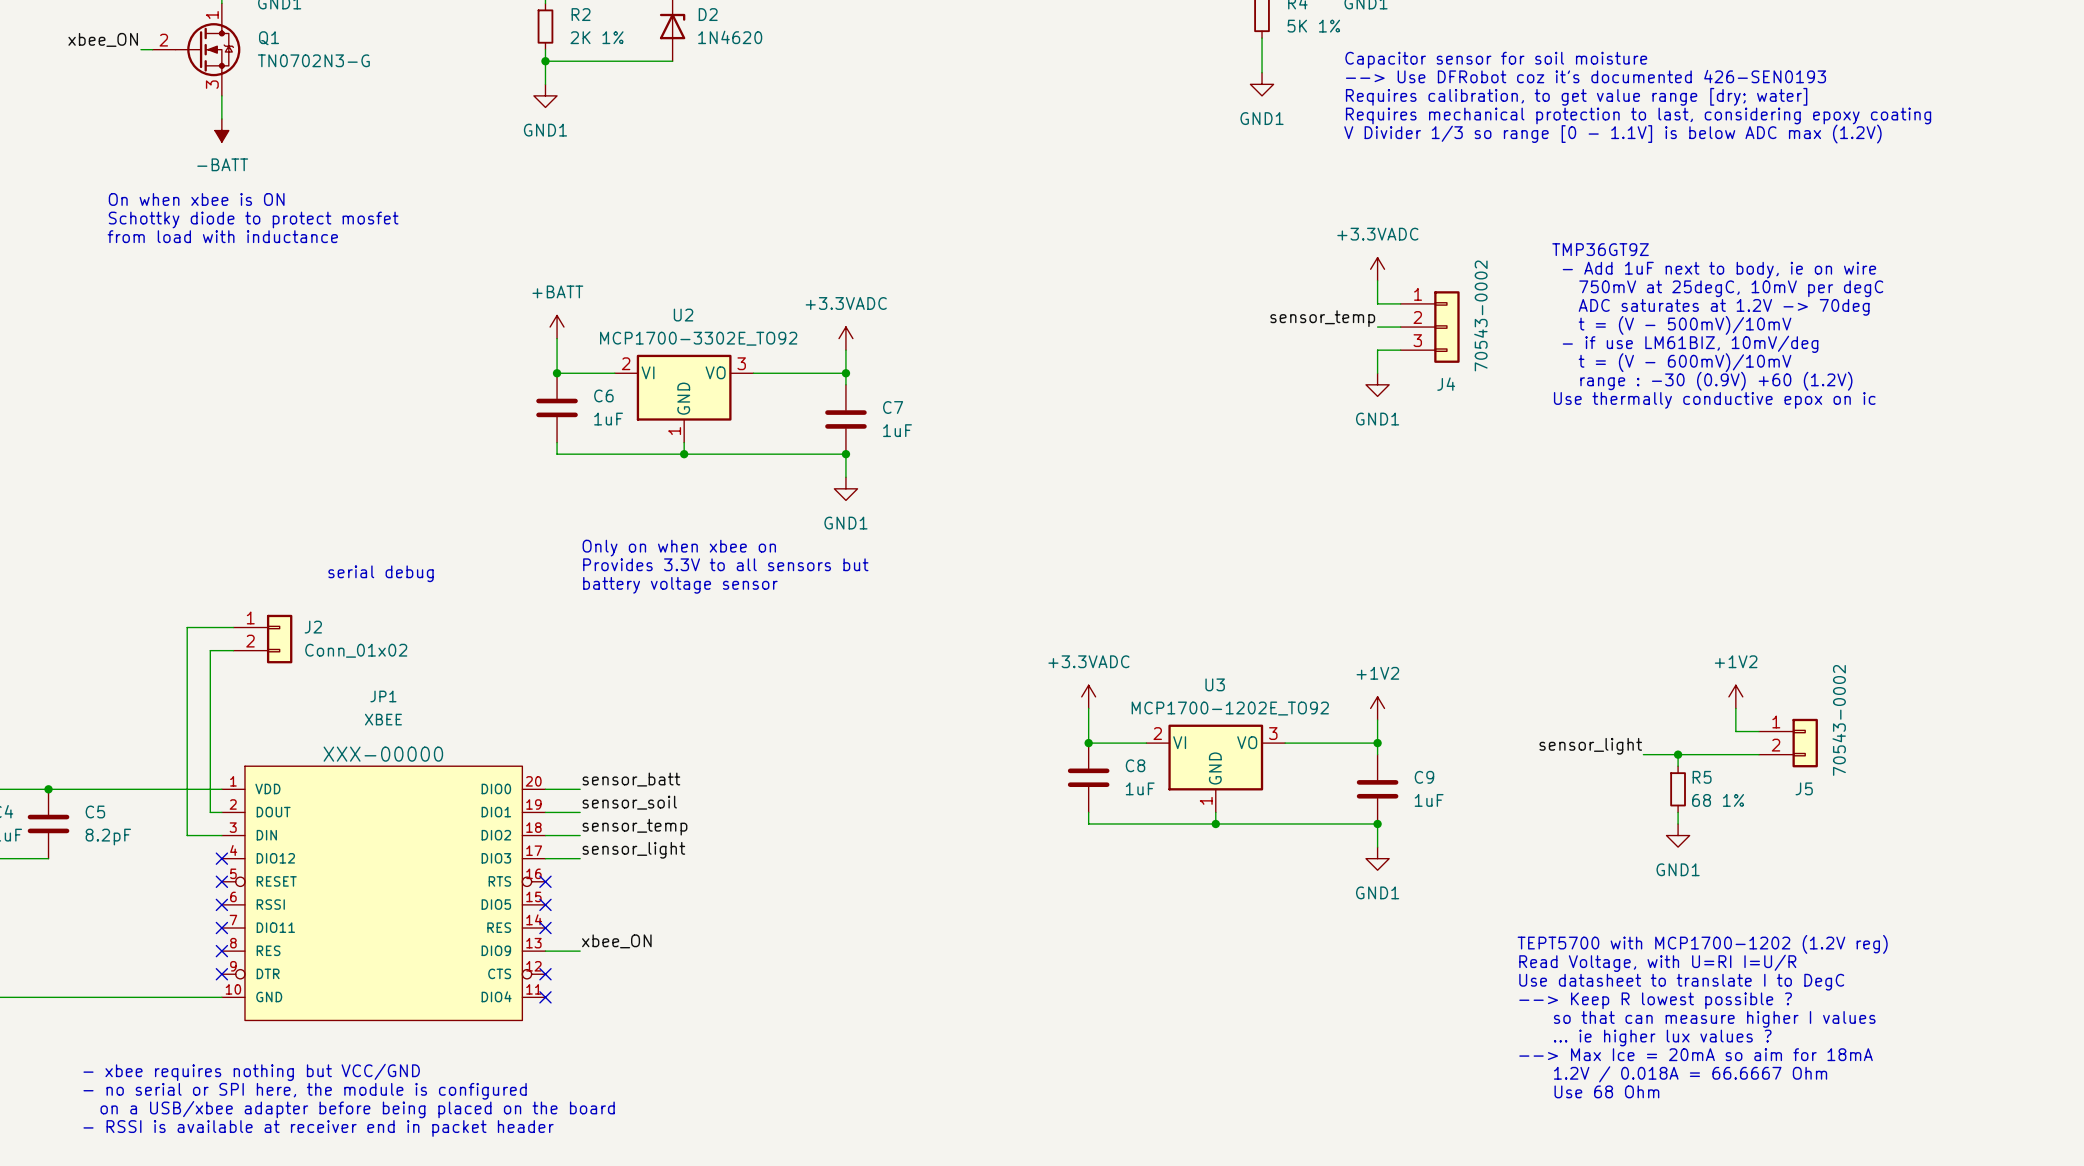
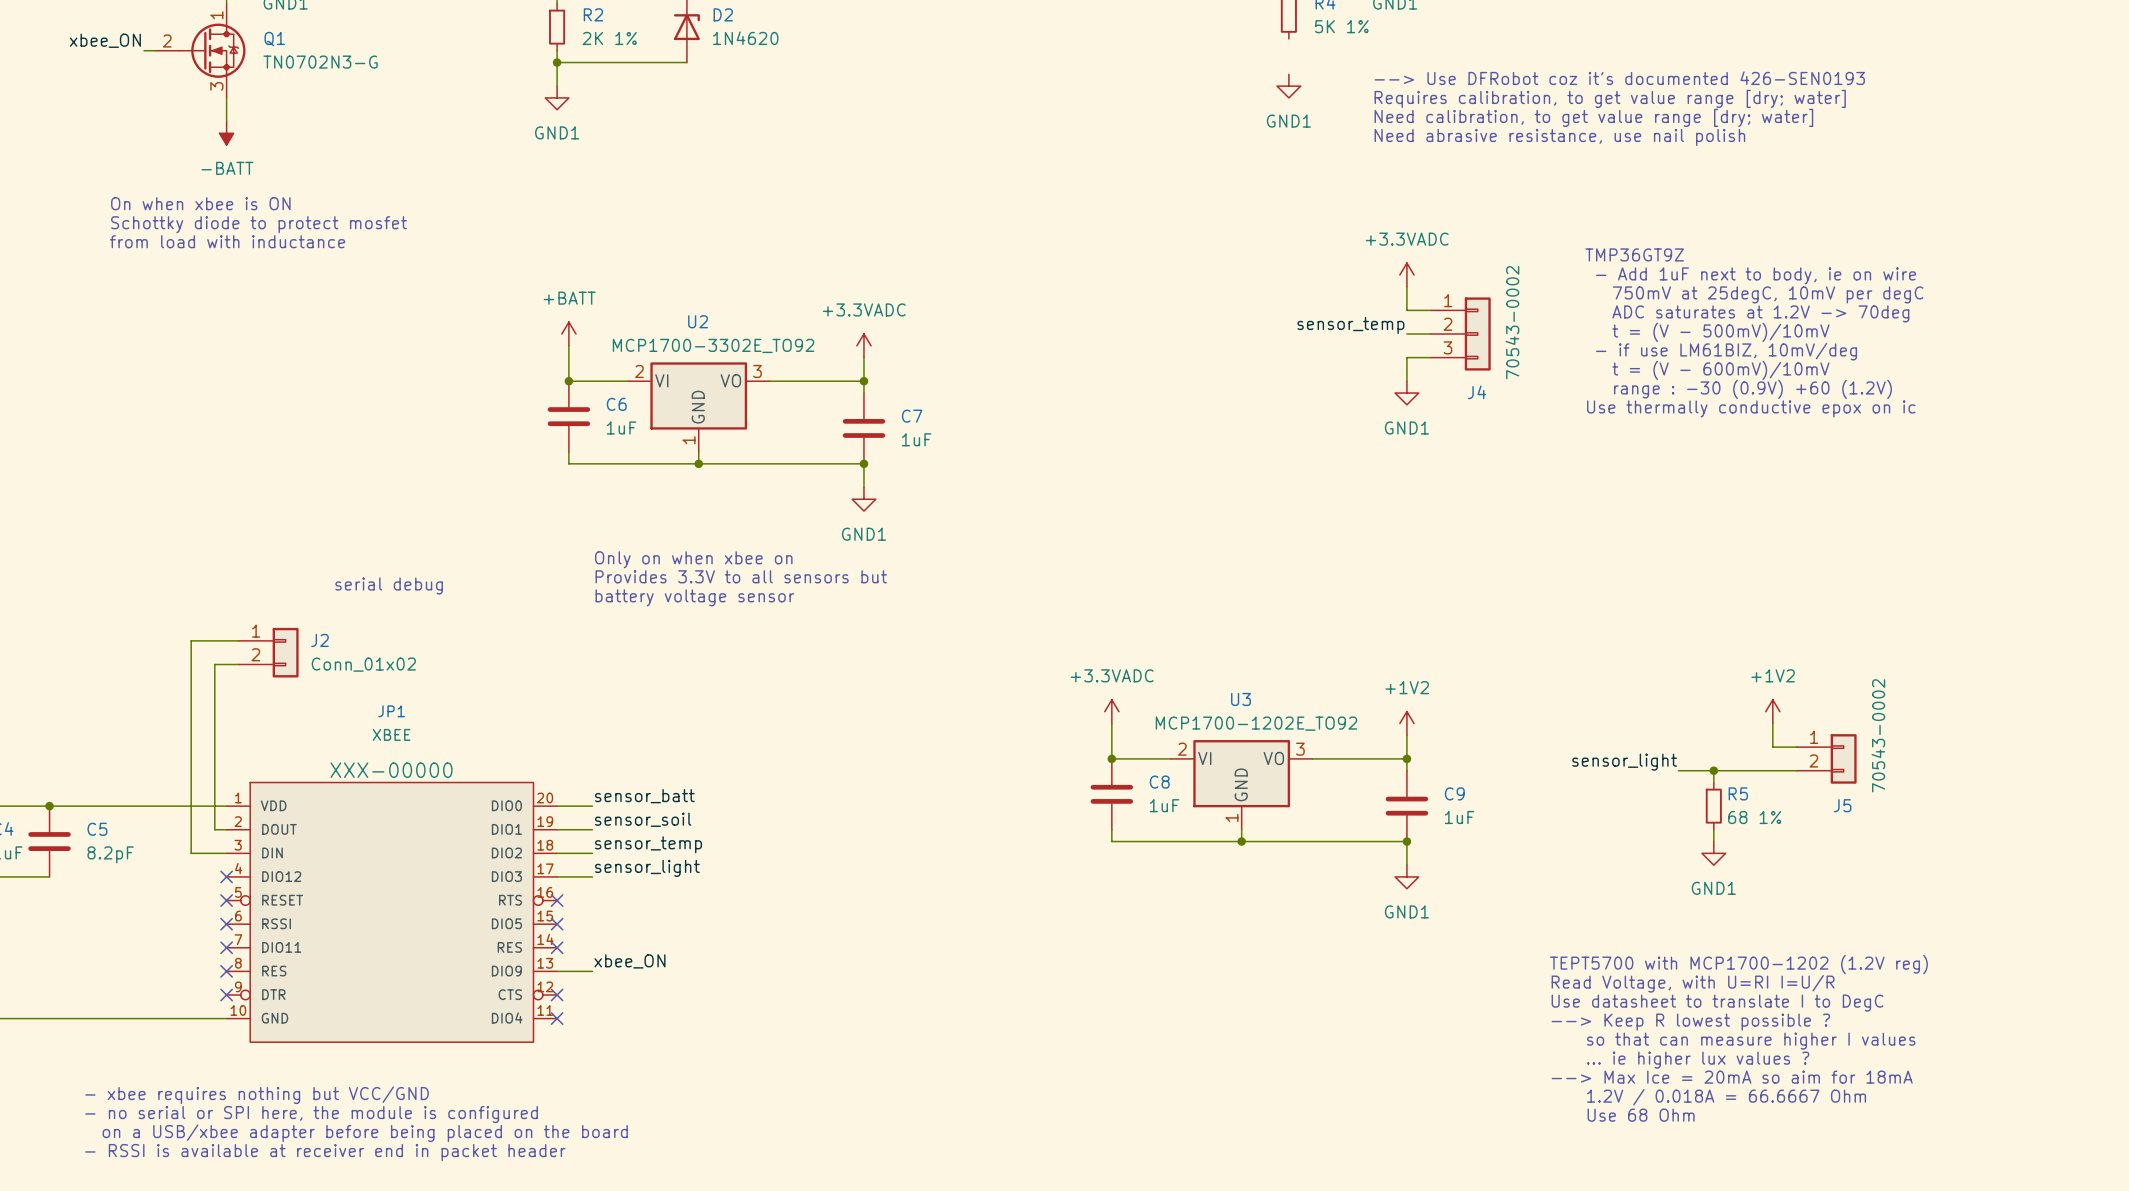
wire: (1262, 38) (1262, 72) -> none
text: Capacitor sensor for soil moisture (1496, 60) -> none
text: Requires mechanical protection to last, considering epoxy coating (1638, 115) -> Need calibration, to get value range [dry; water] (1593, 117)
text: V Divider 1/3 so range [0 - 1.1V] is below ADC max (1.2V) (1612, 134) -> Need abrasive resistance, use nail polish (1559, 137)

